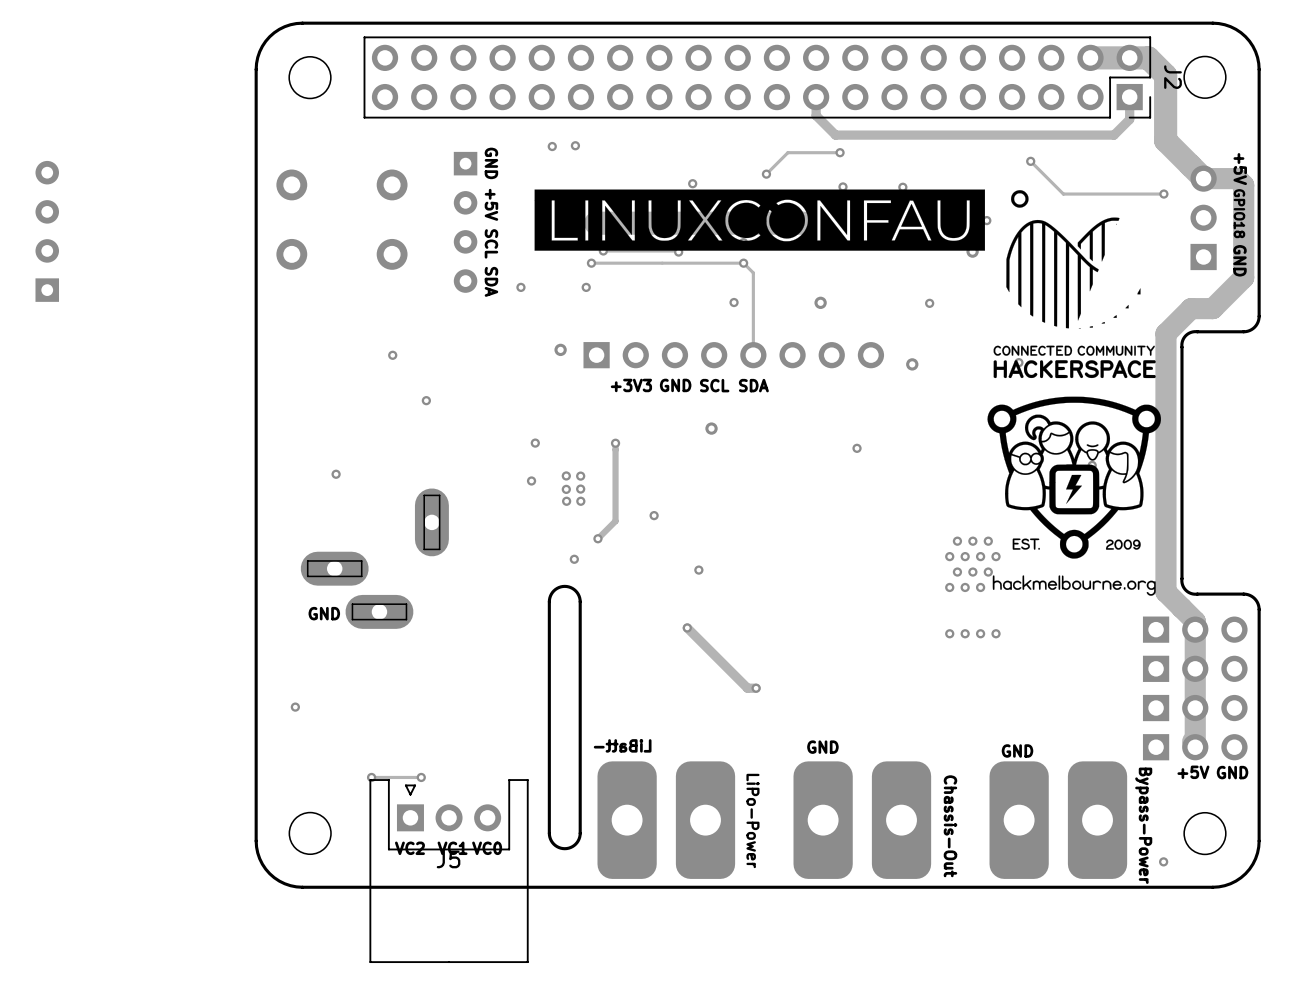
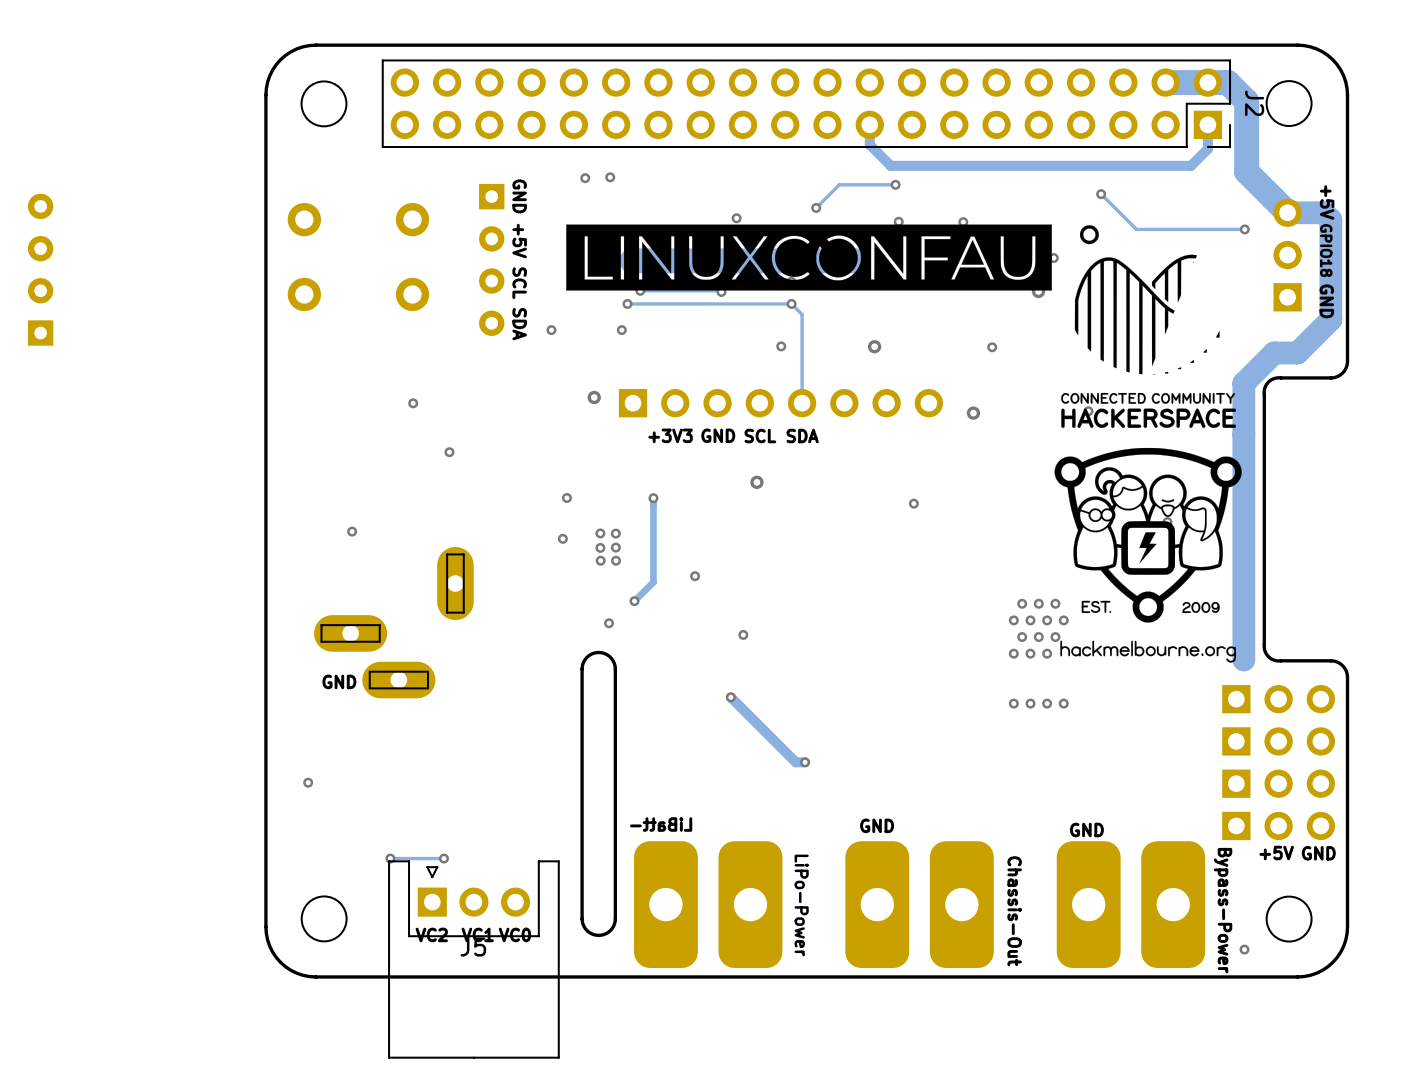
track: (1165, 333) (1165, 592) (1195, 621) (1195, 747) -> (1247, 380) (1243, 383) (1243, 660)

